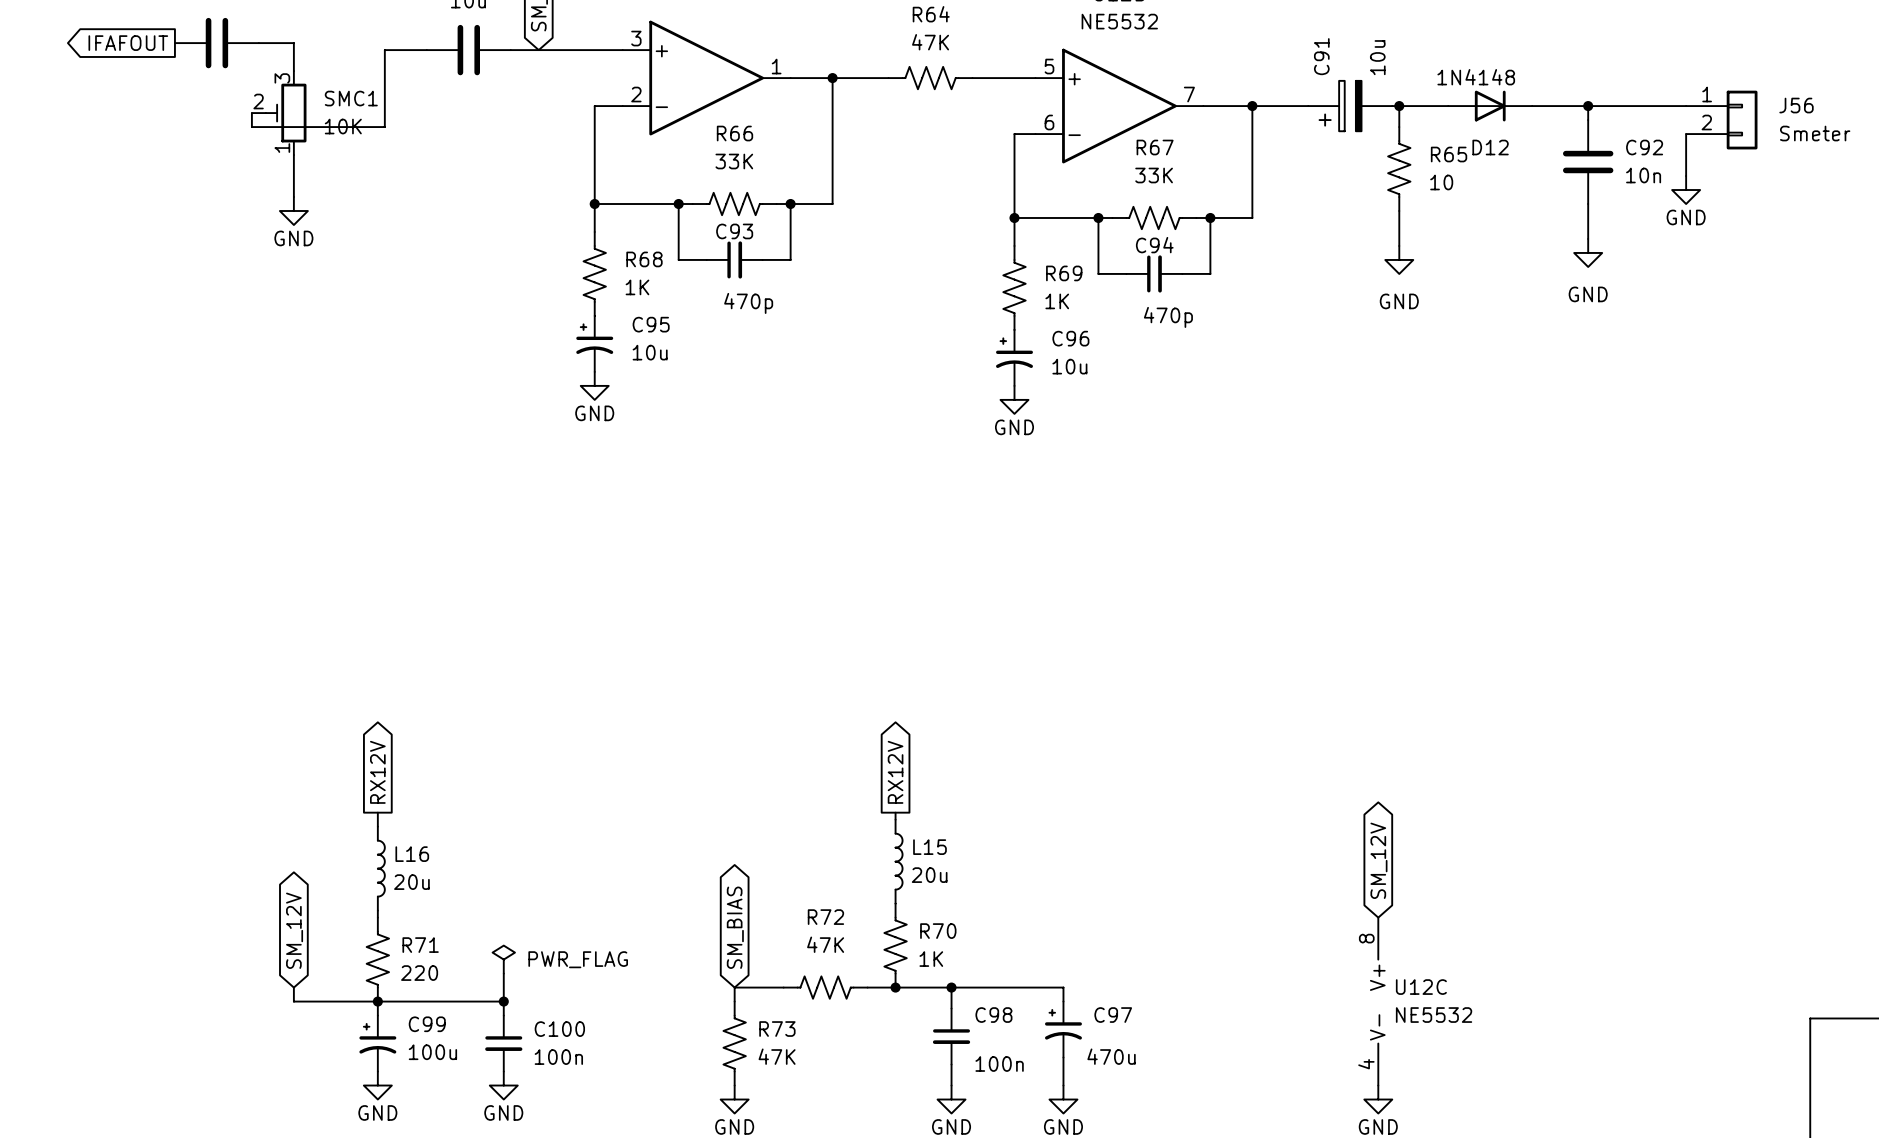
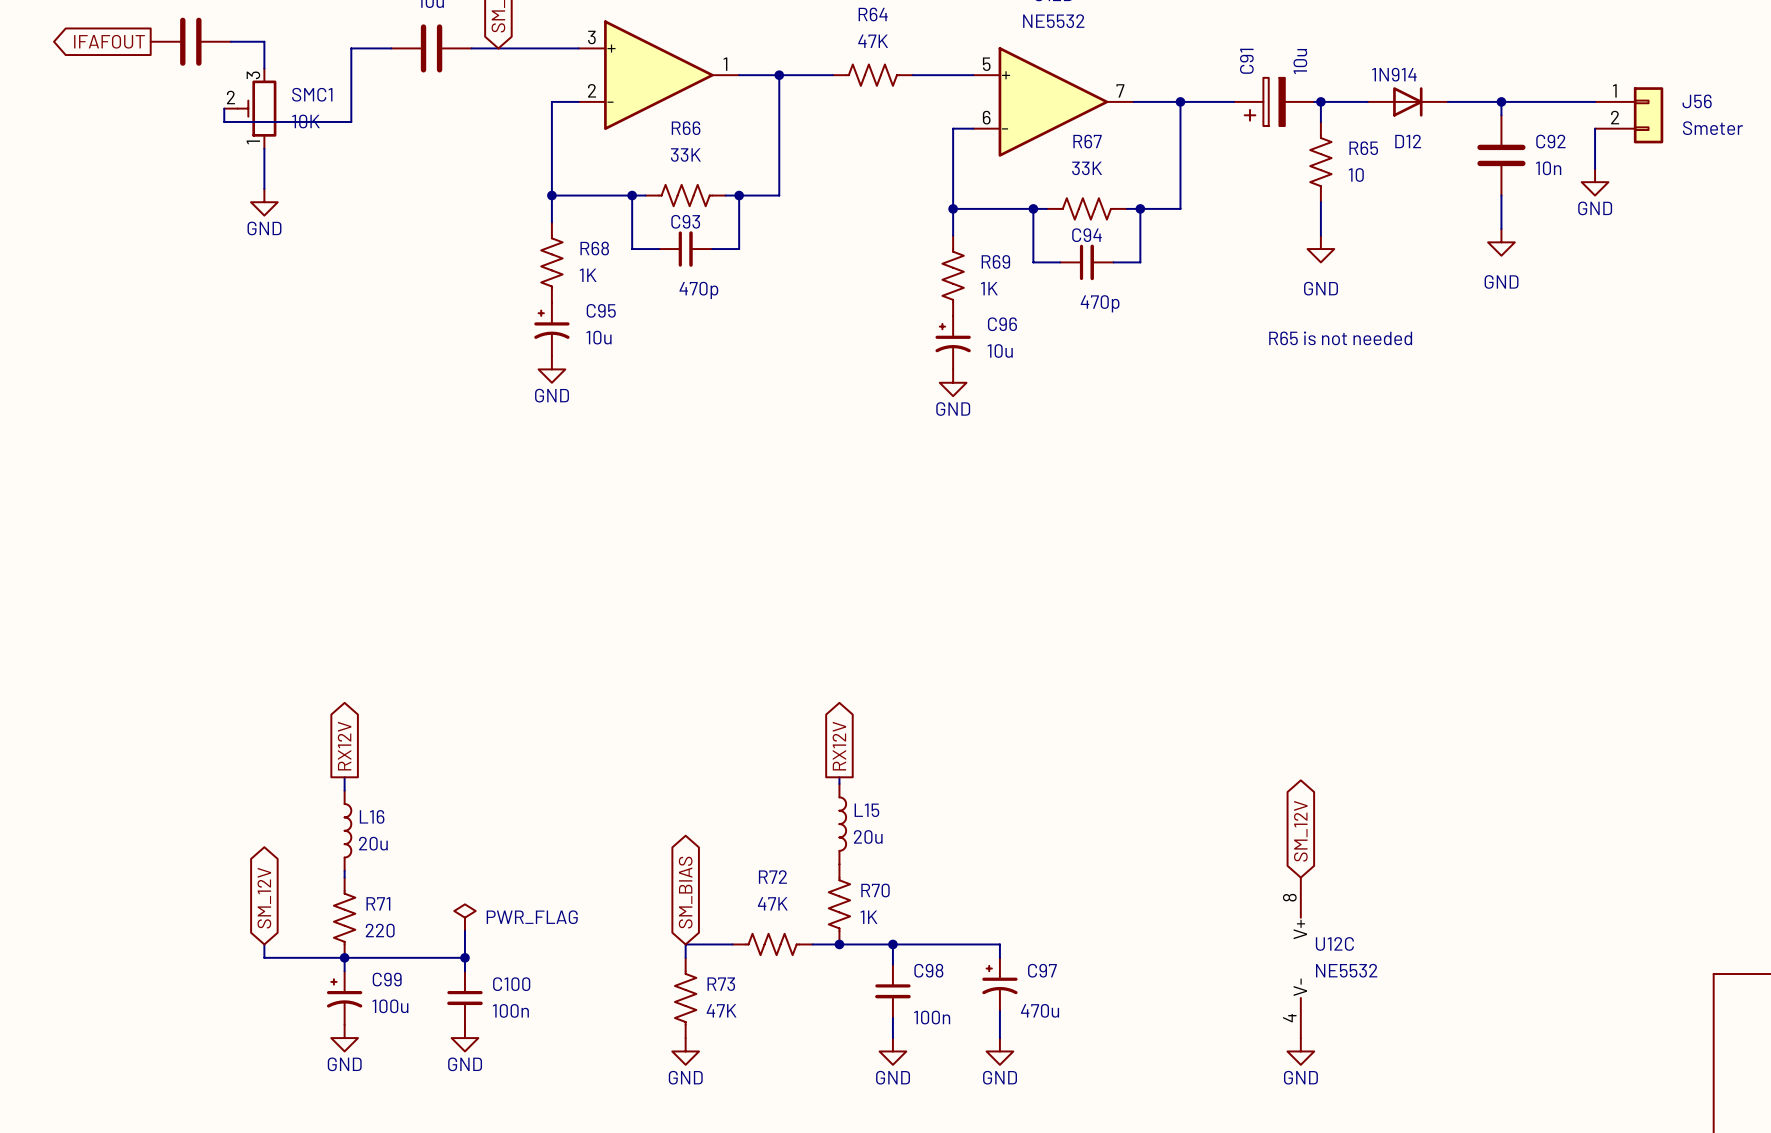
D12 value: 1N4148 (1476, 77) -> 1N914 (1394, 74)
text: none -> R65 is not needed (1340, 338)

